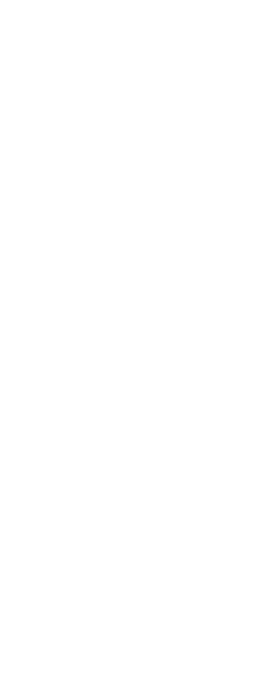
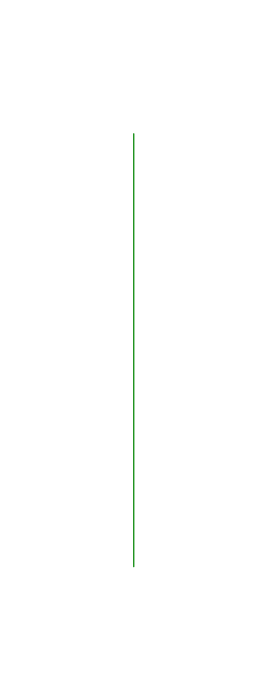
wire: none -> (133, 133) (133, 566)

